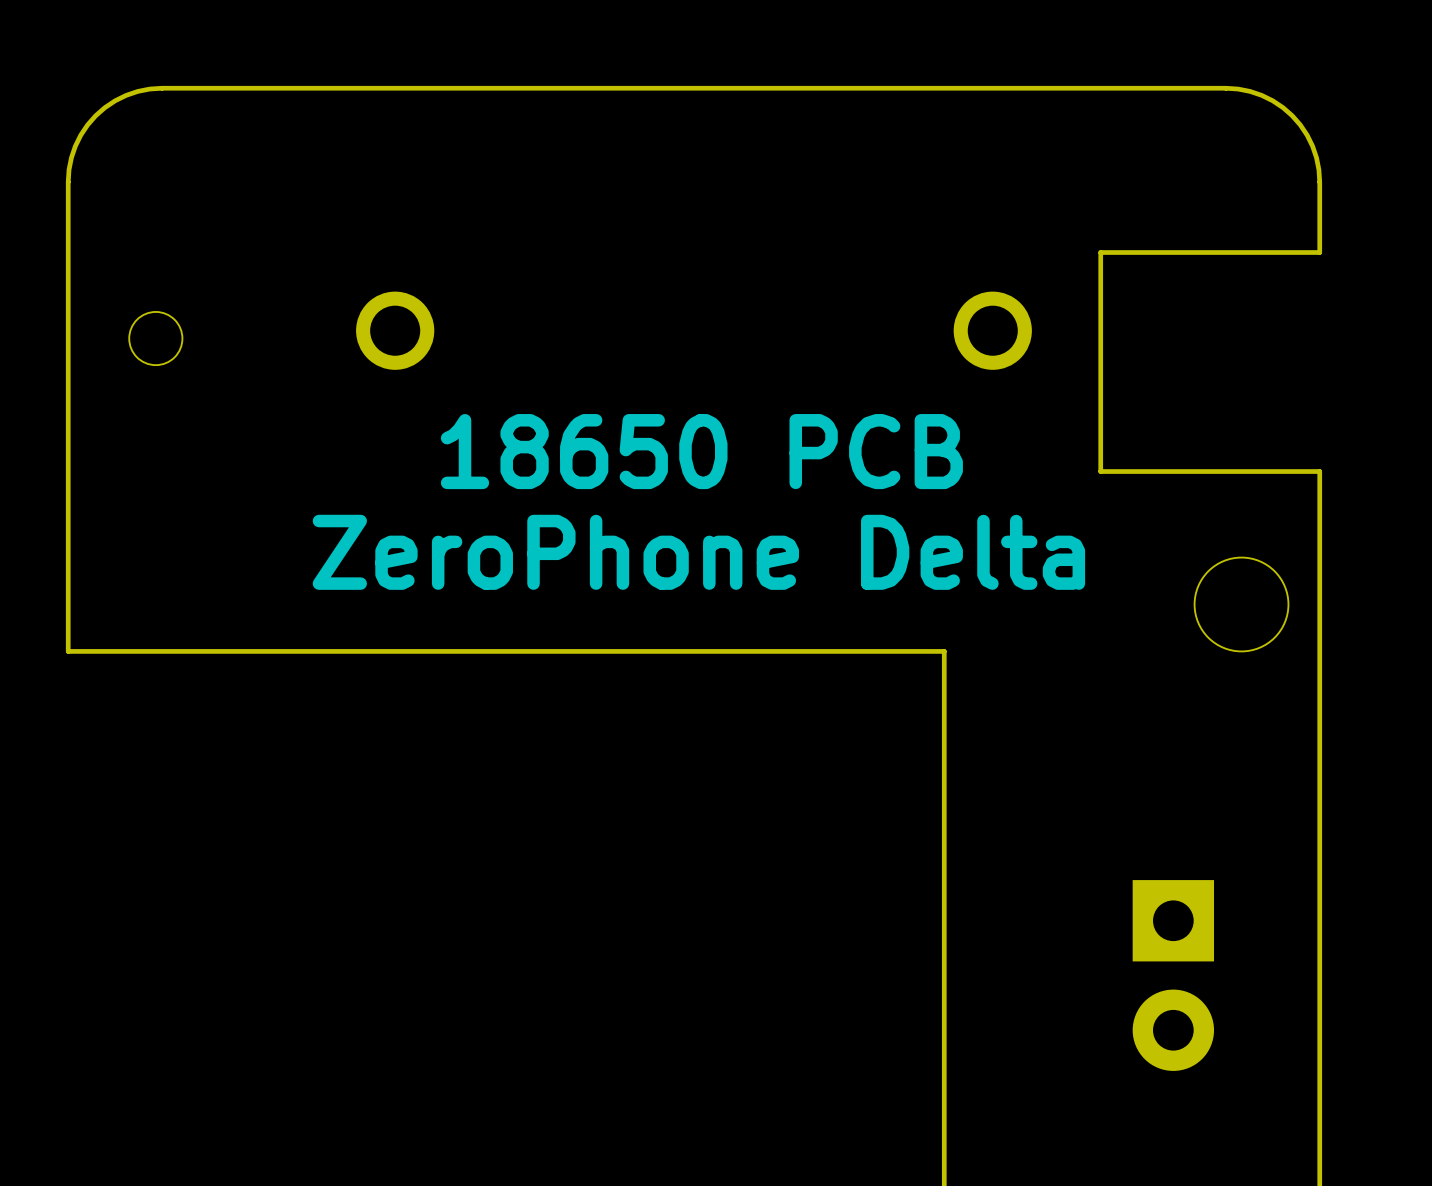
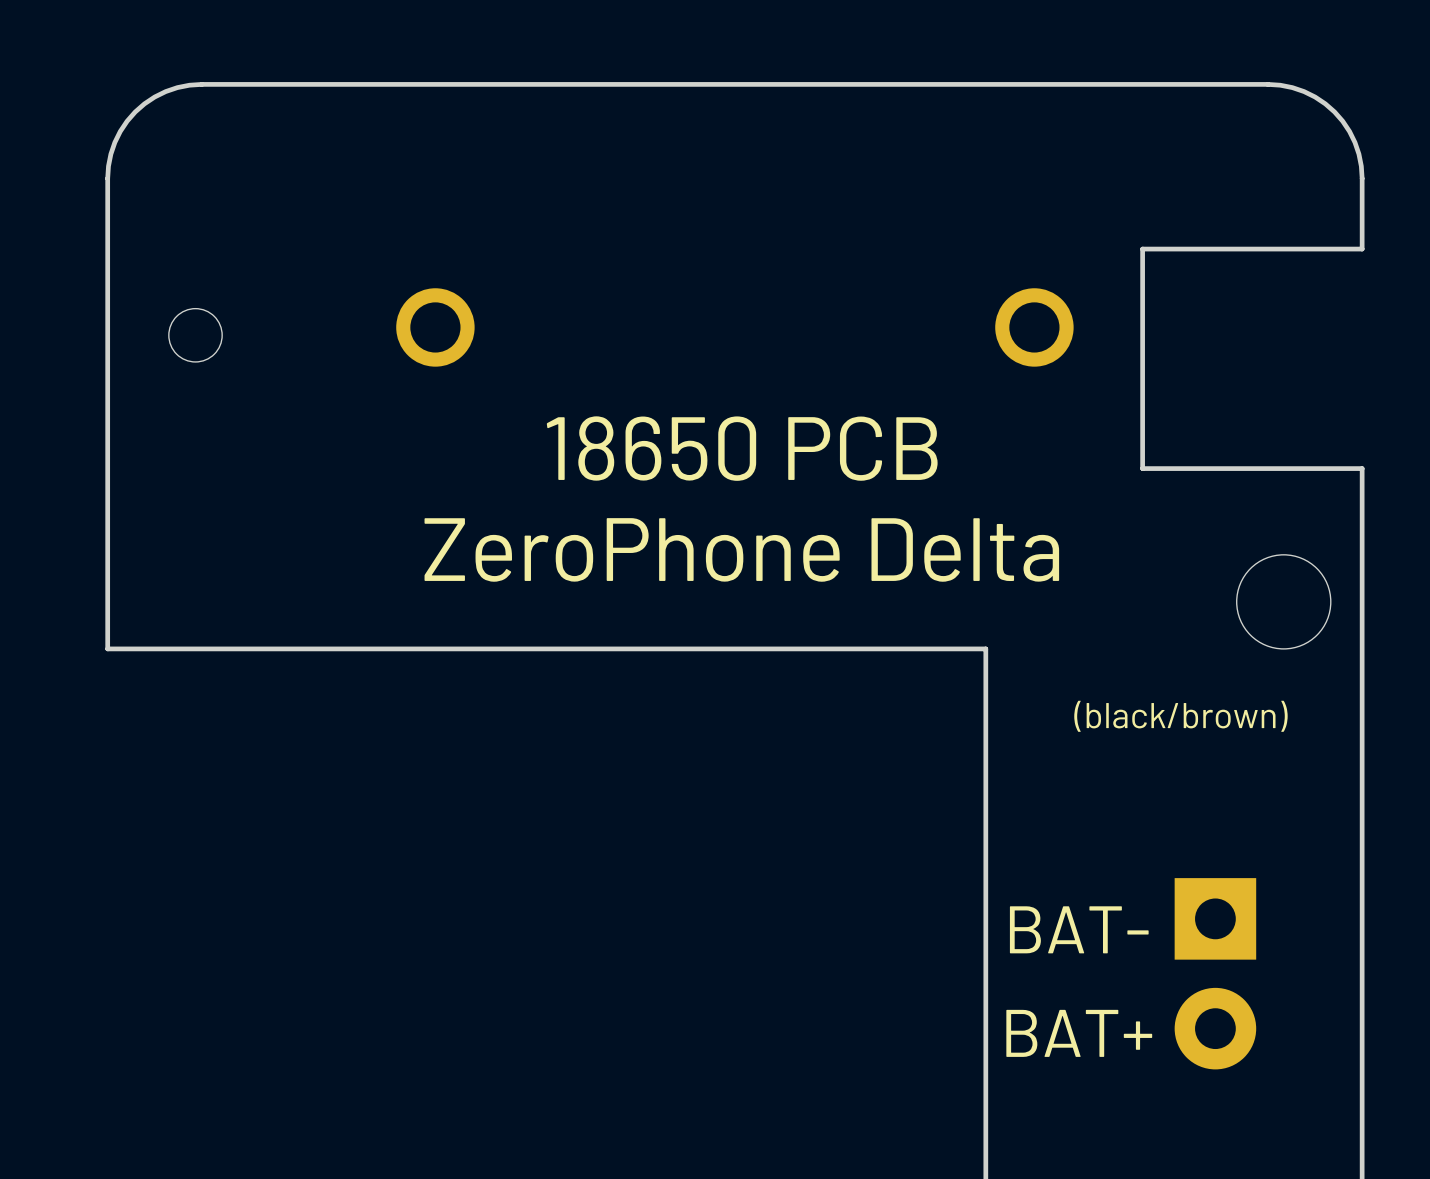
text: none -> (black/brown) (1180, 716)
text: none -> BAT- (1079, 929)
text: none -> BAT+ (1079, 1033)

